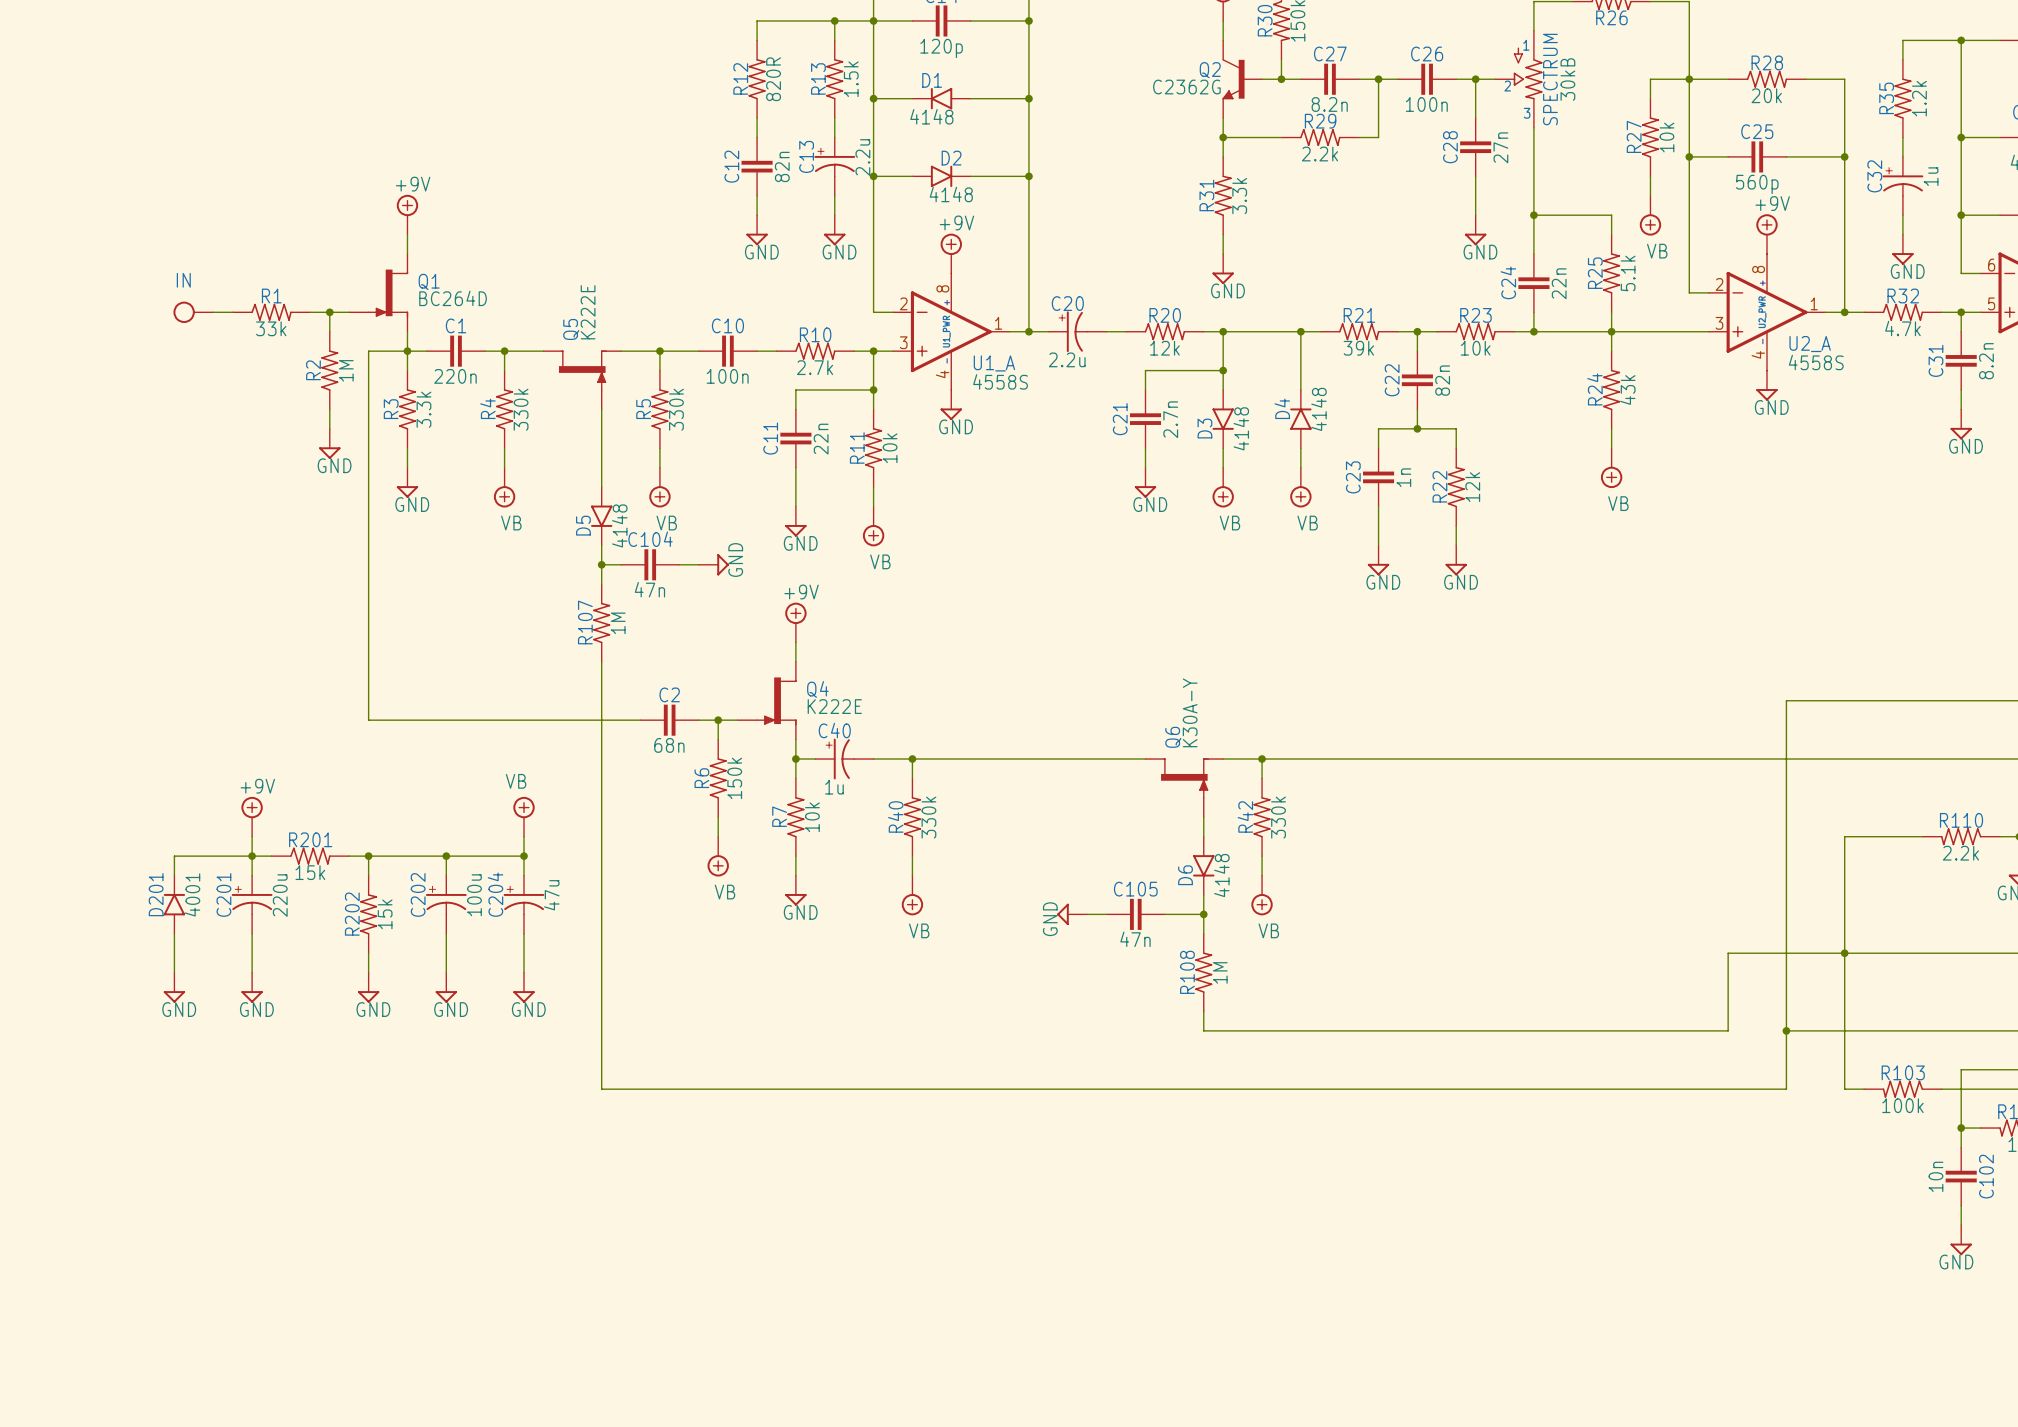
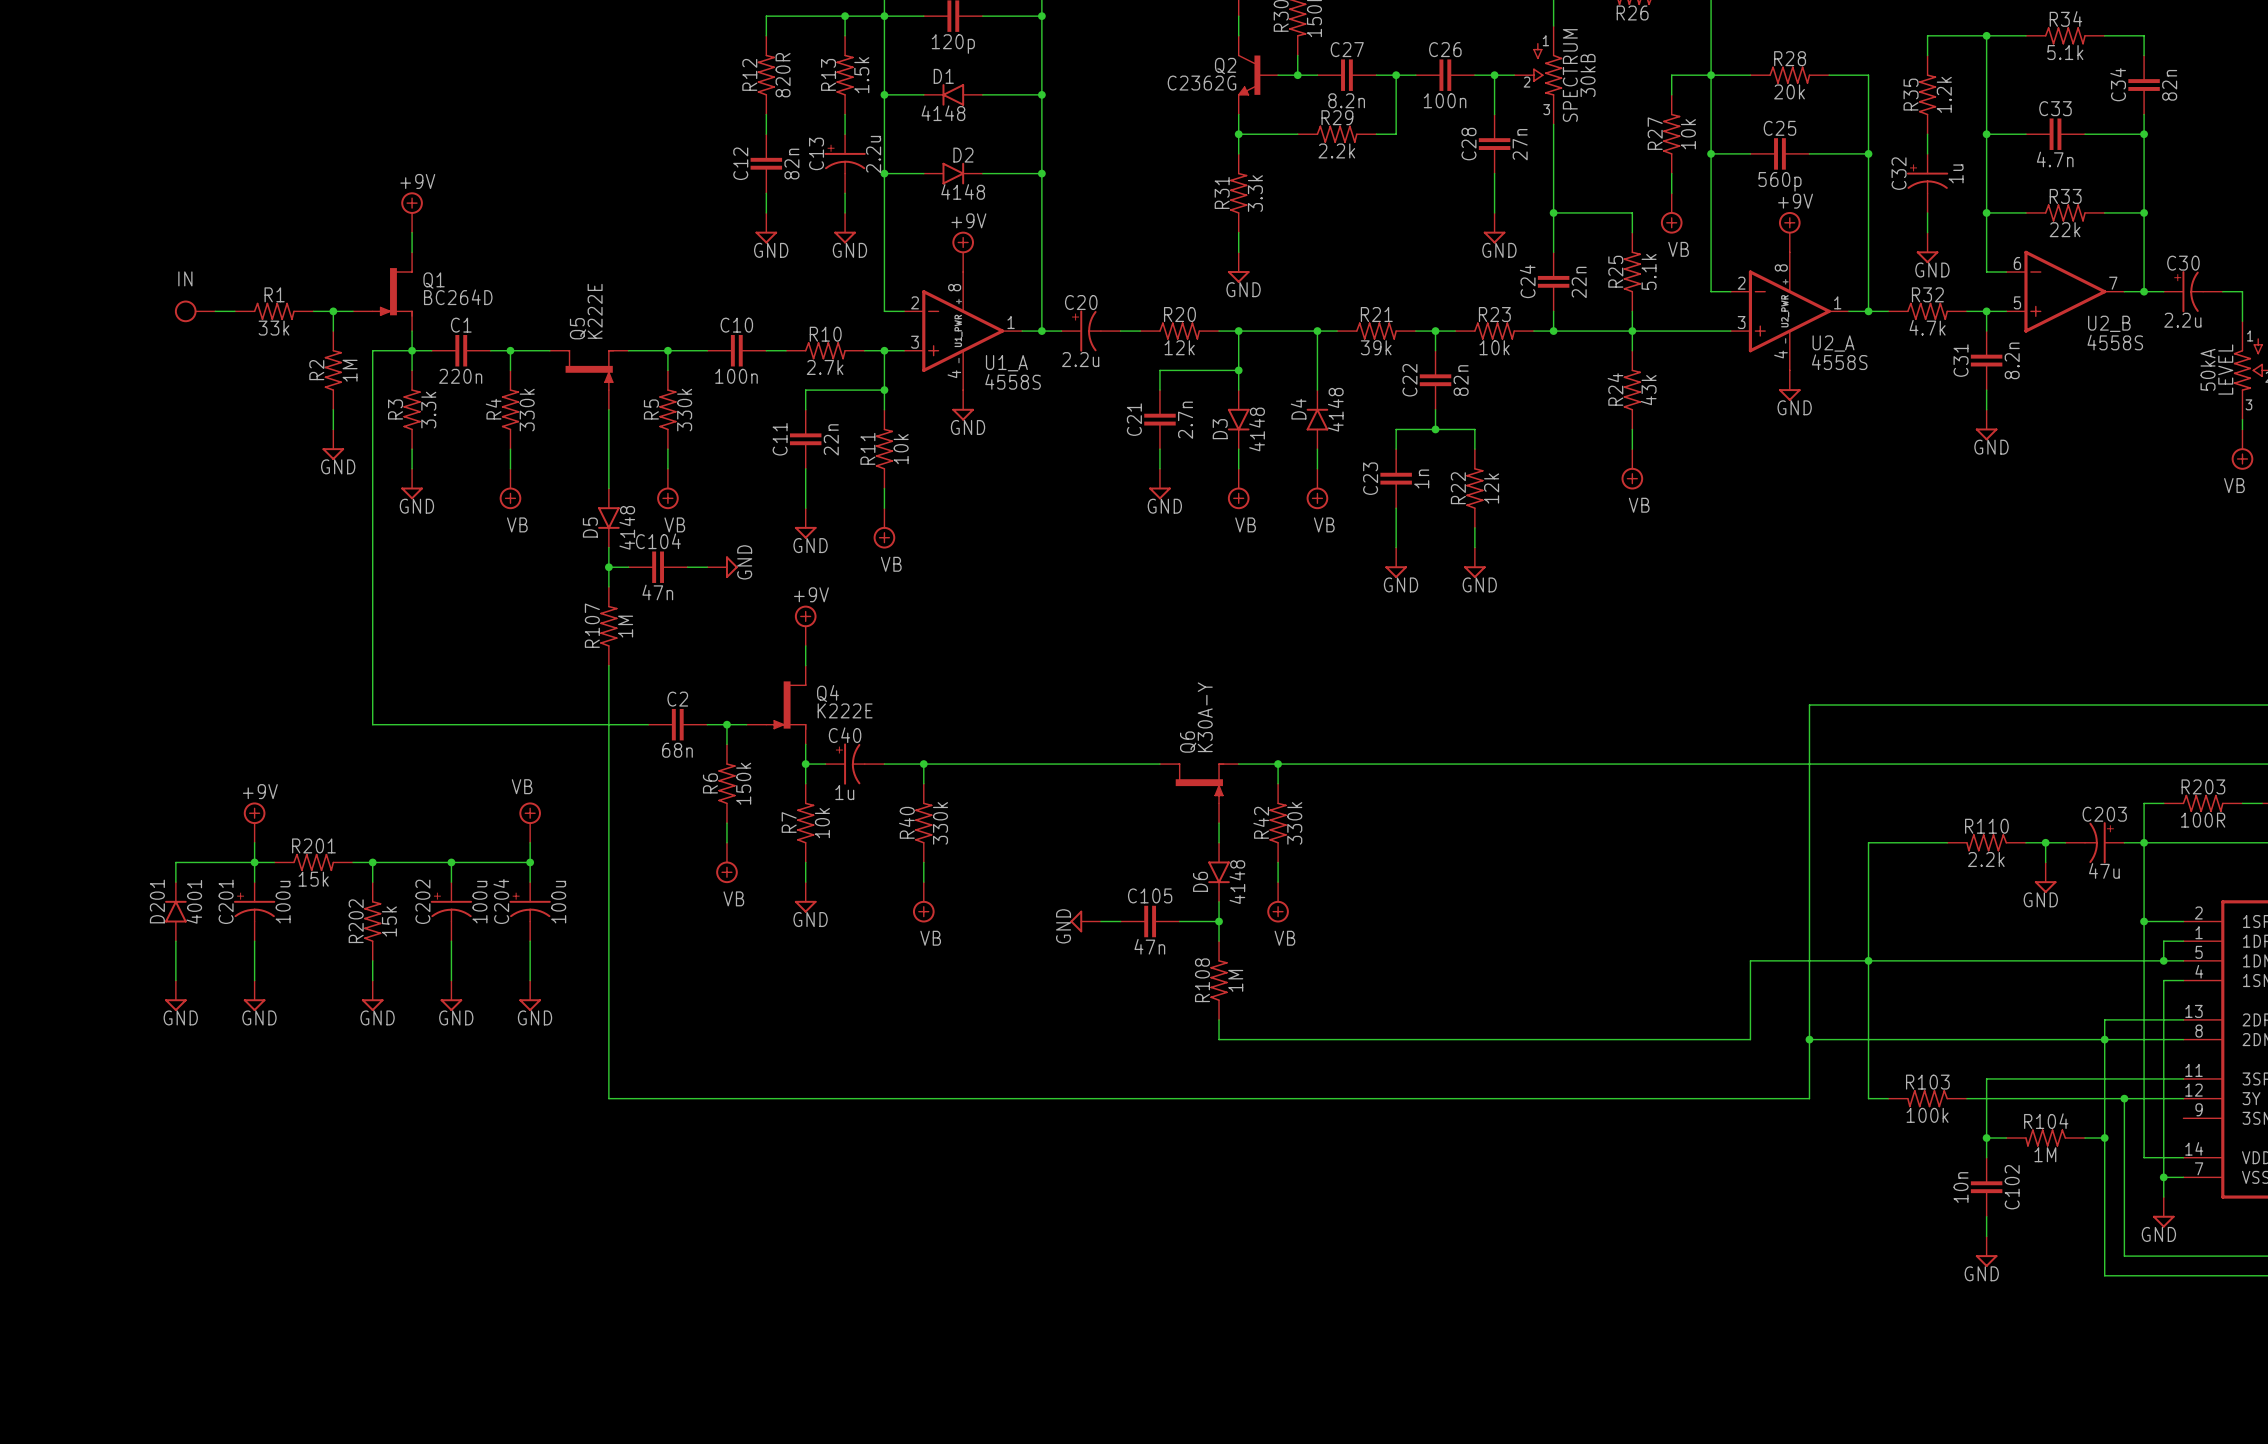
C201 value: 220u (280, 895) -> 100u (283, 902)
C204 value: 47u (551, 895) -> 100u (558, 902)

